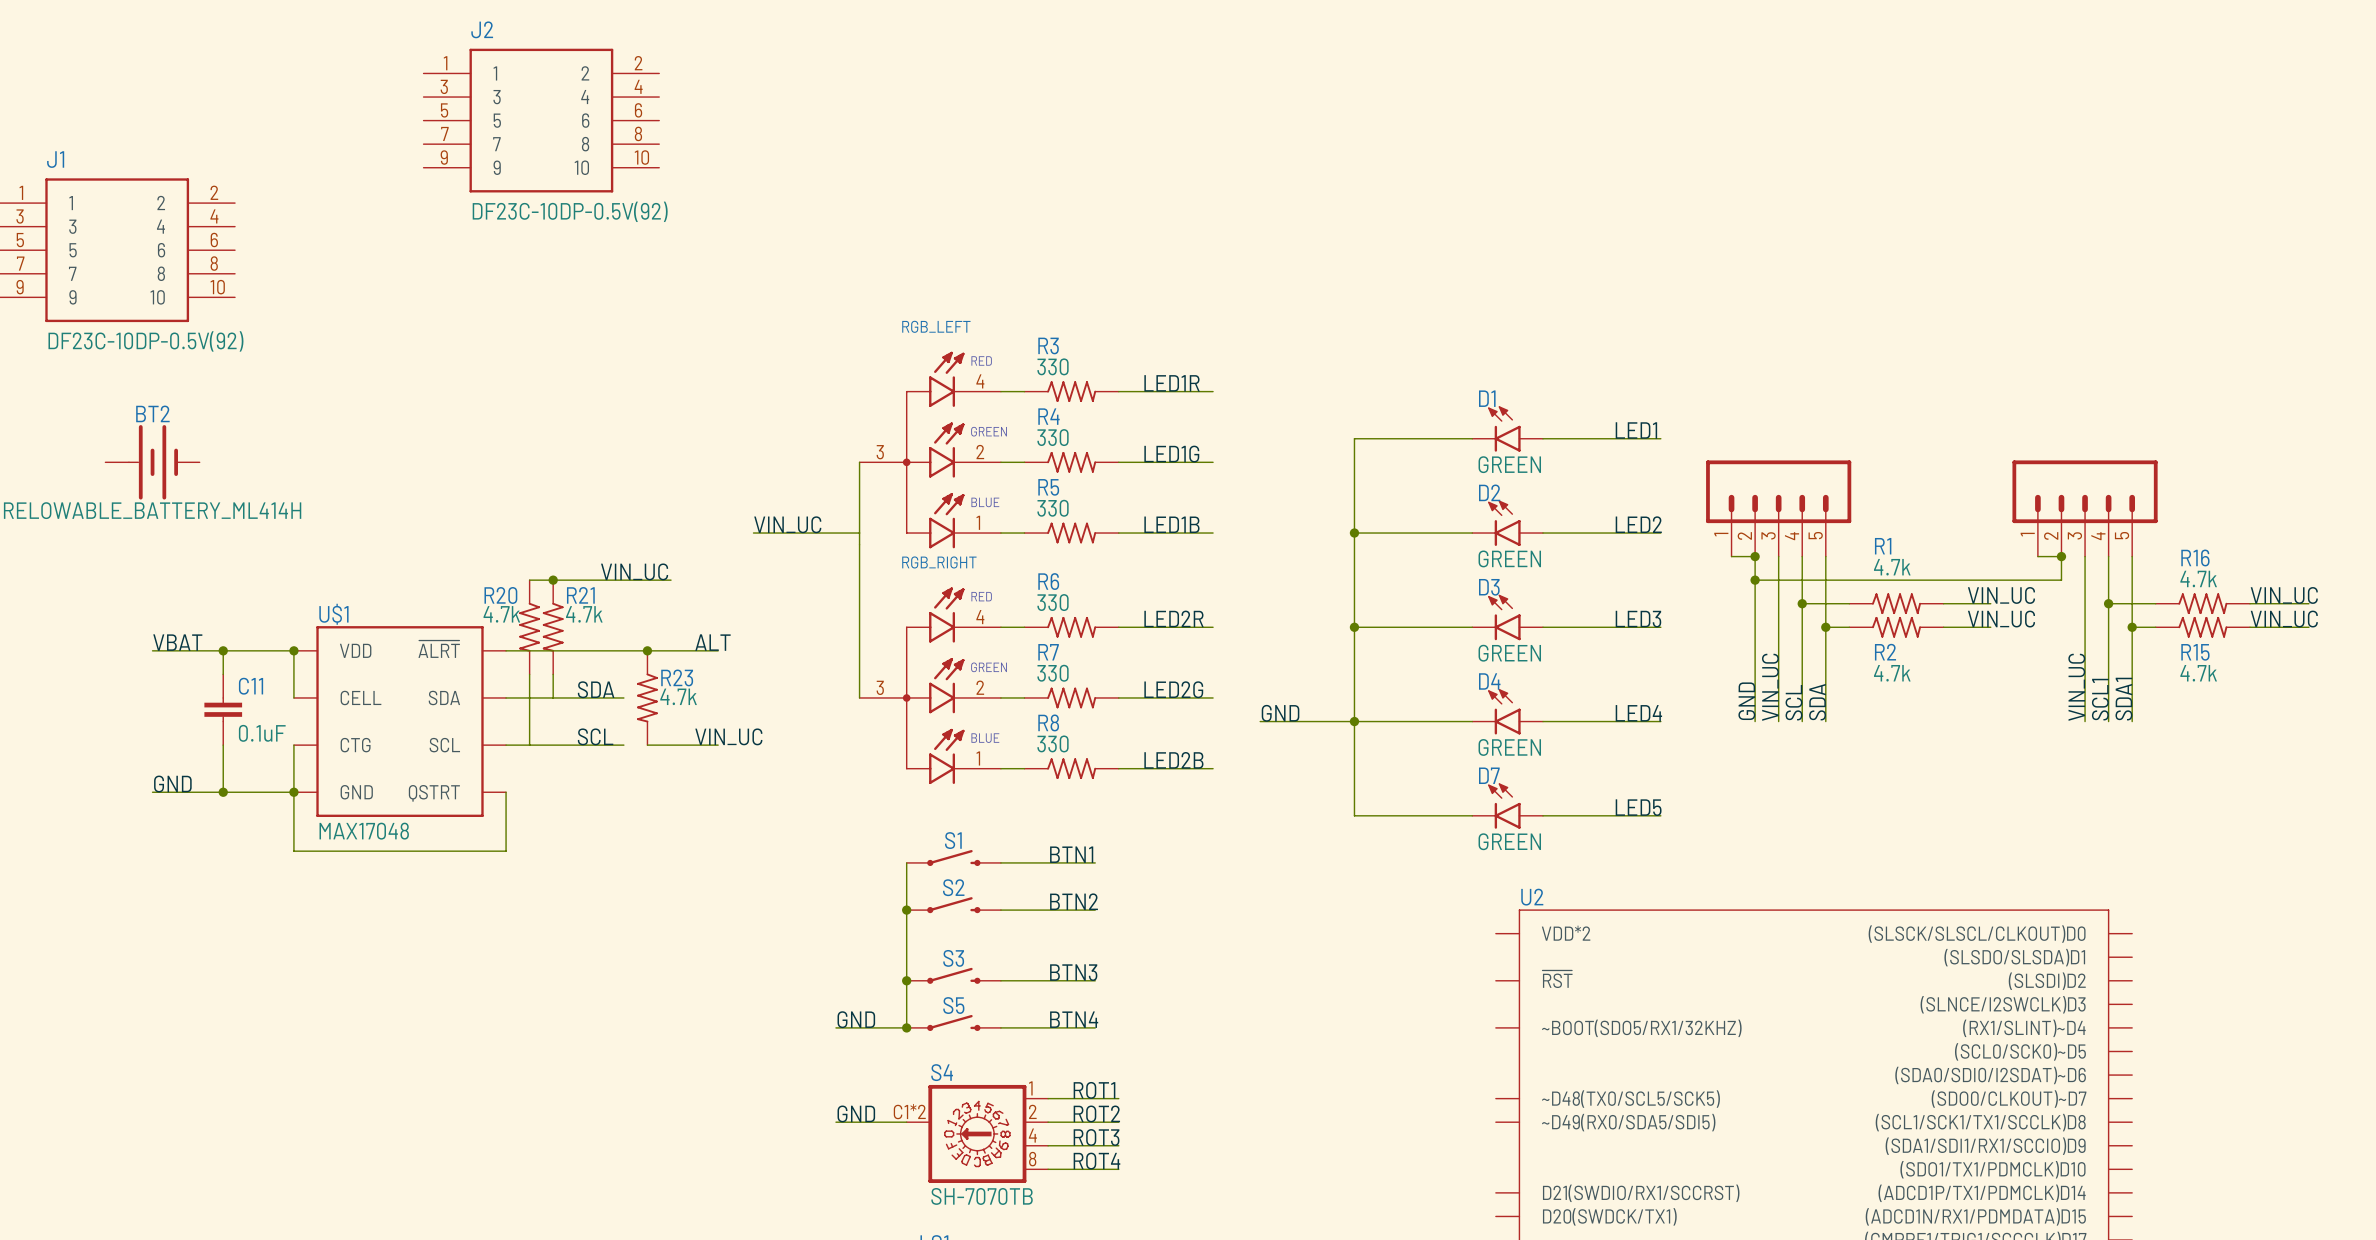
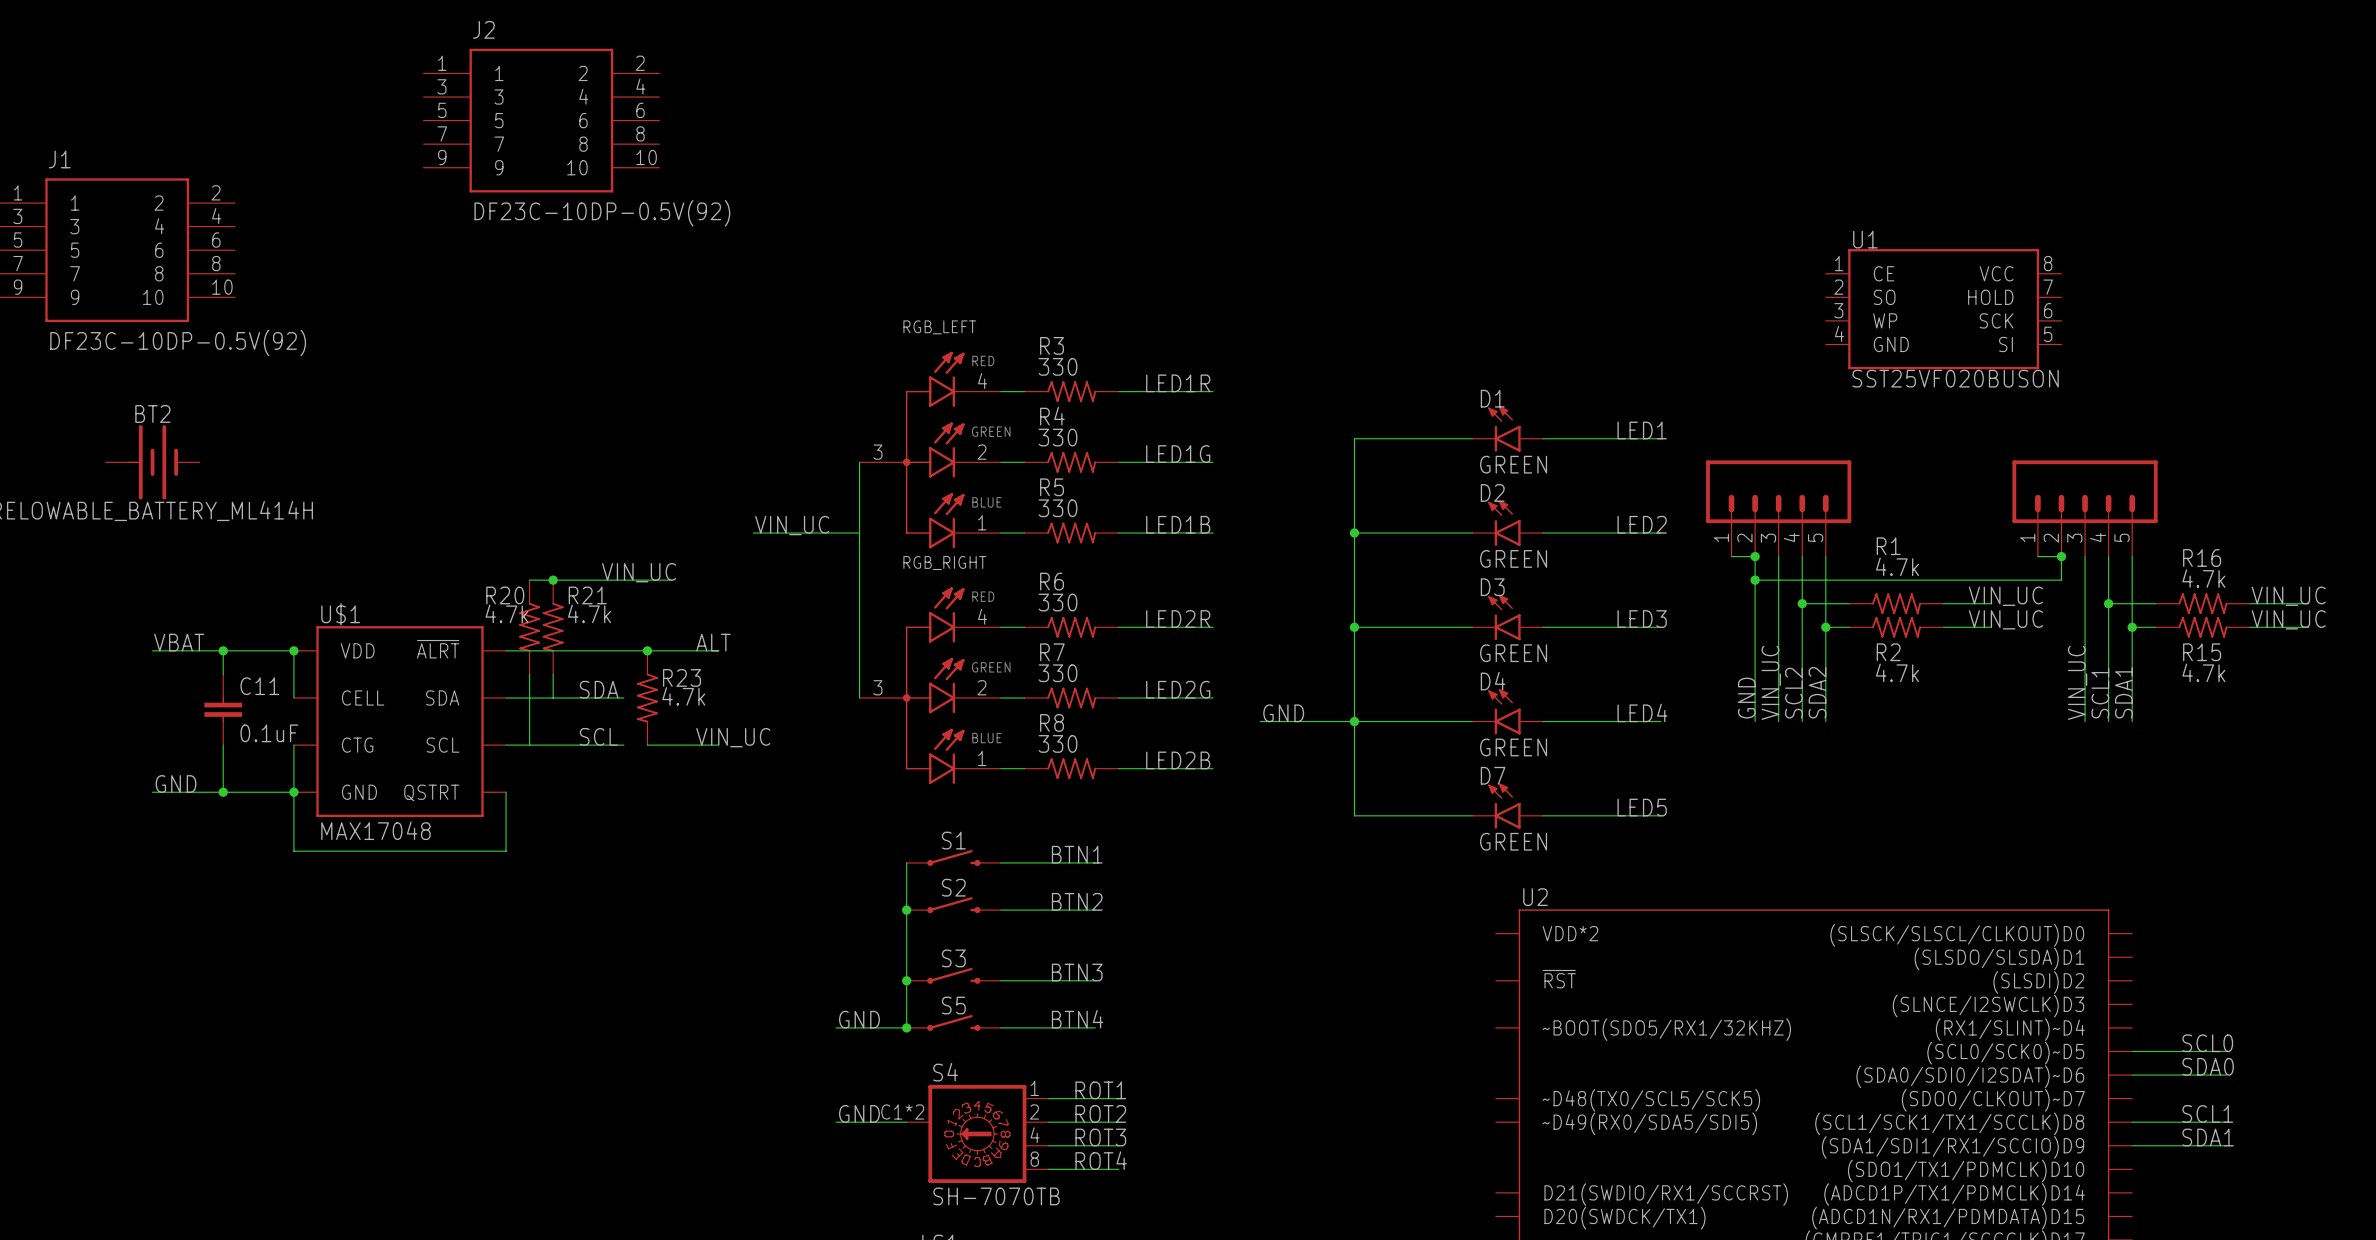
U1: none -> SST25VF020BUSON (1943, 309)
label: SCL (1794, 702) -> SCL2 (1793, 693)
label: SDA (1817, 702) -> SDA2 (1817, 692)
label: none -> SCL0 (2207, 1043)
wire: none -> (2132, 1051) (2226, 1051)
label: none -> SDA0 (2208, 1066)
wire: none -> (2132, 1075) (2226, 1075)
label: none -> SCL1 (2207, 1113)
wire: none -> (2132, 1122) (2226, 1122)
label: none -> SDA1 (2208, 1137)
wire: none -> (2132, 1145) (2226, 1145)

